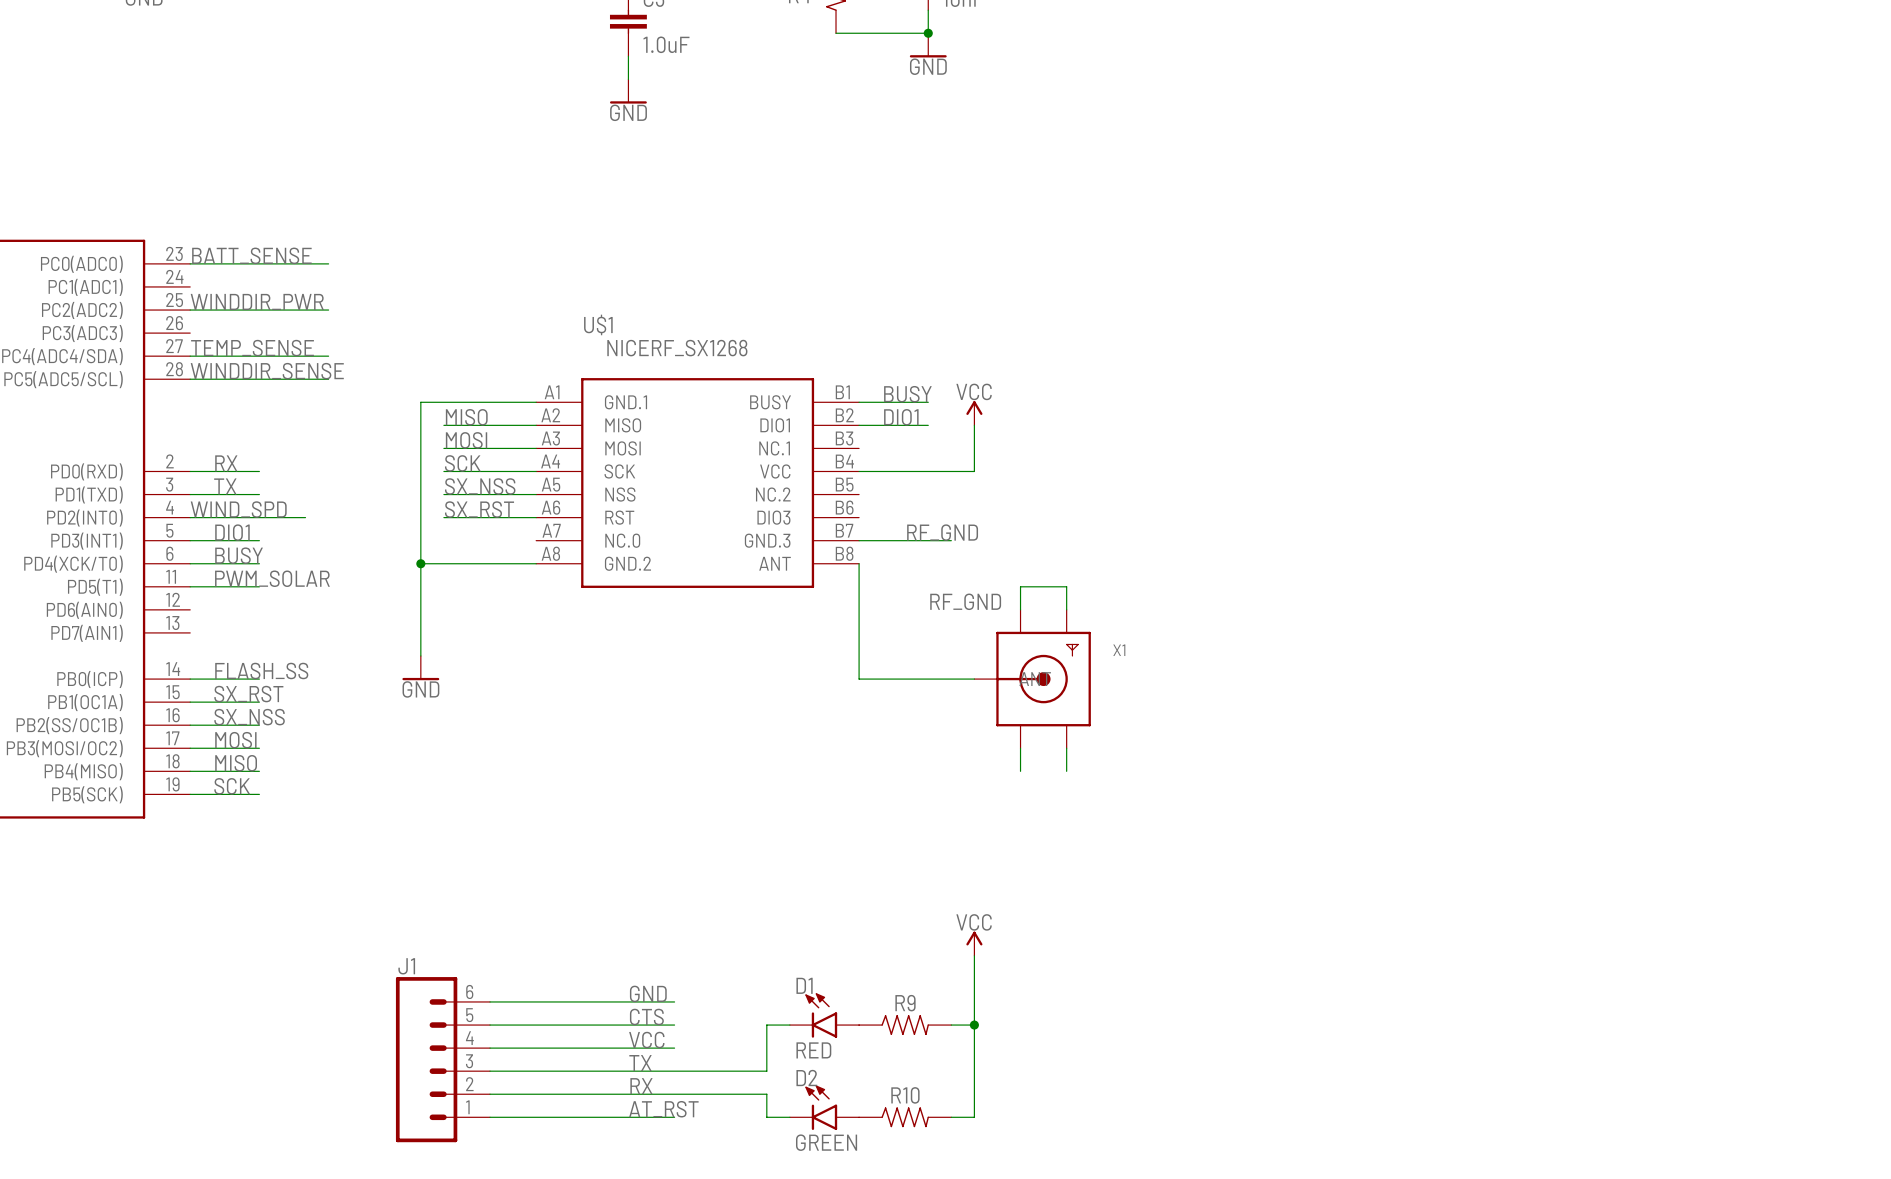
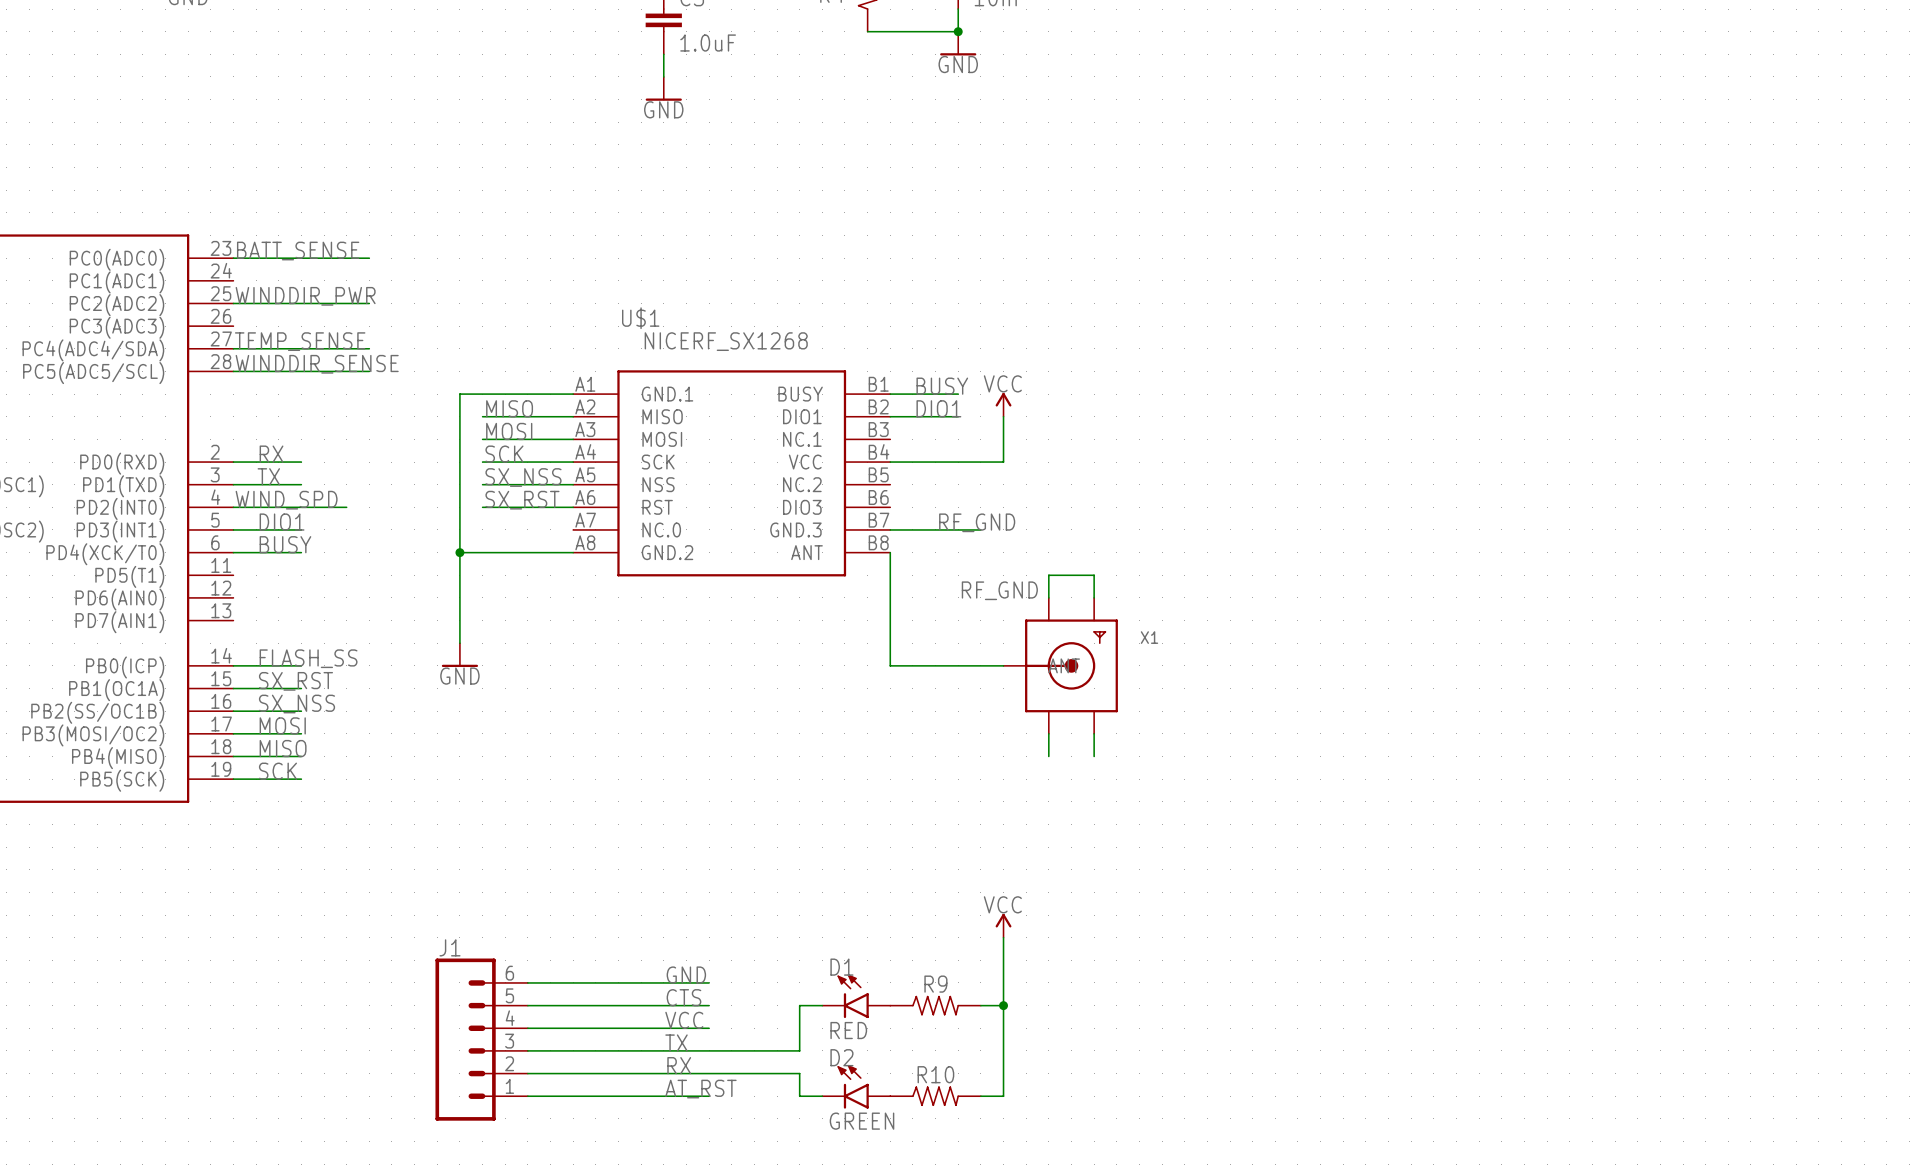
label: PWM_SOLAR (272, 578) -> none
wire: (190, 586) (259, 586) -> none

